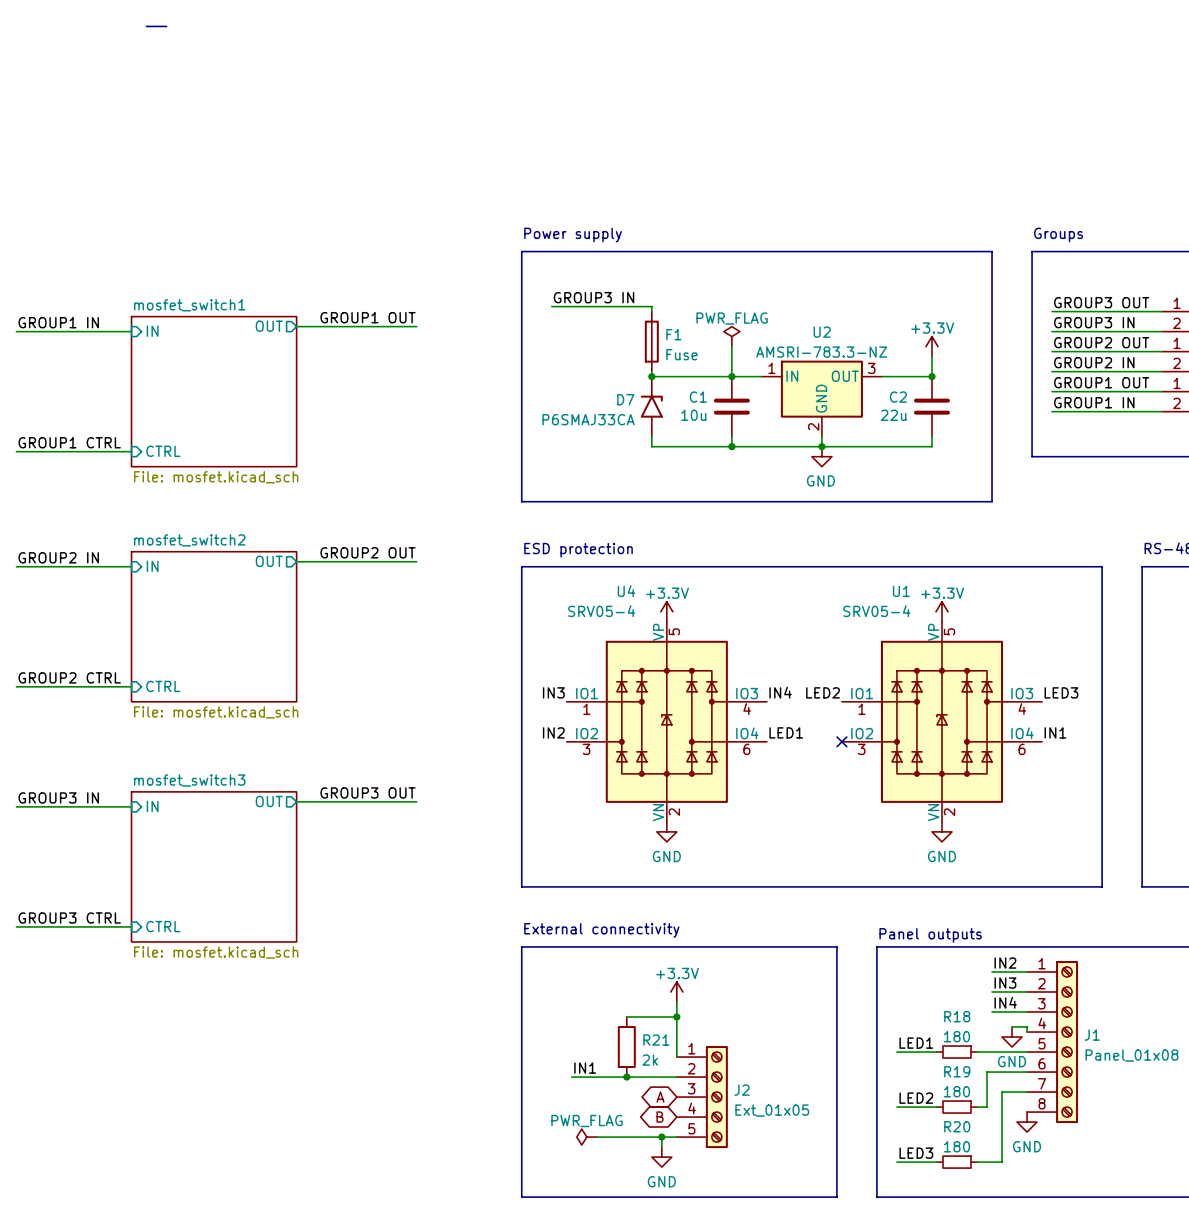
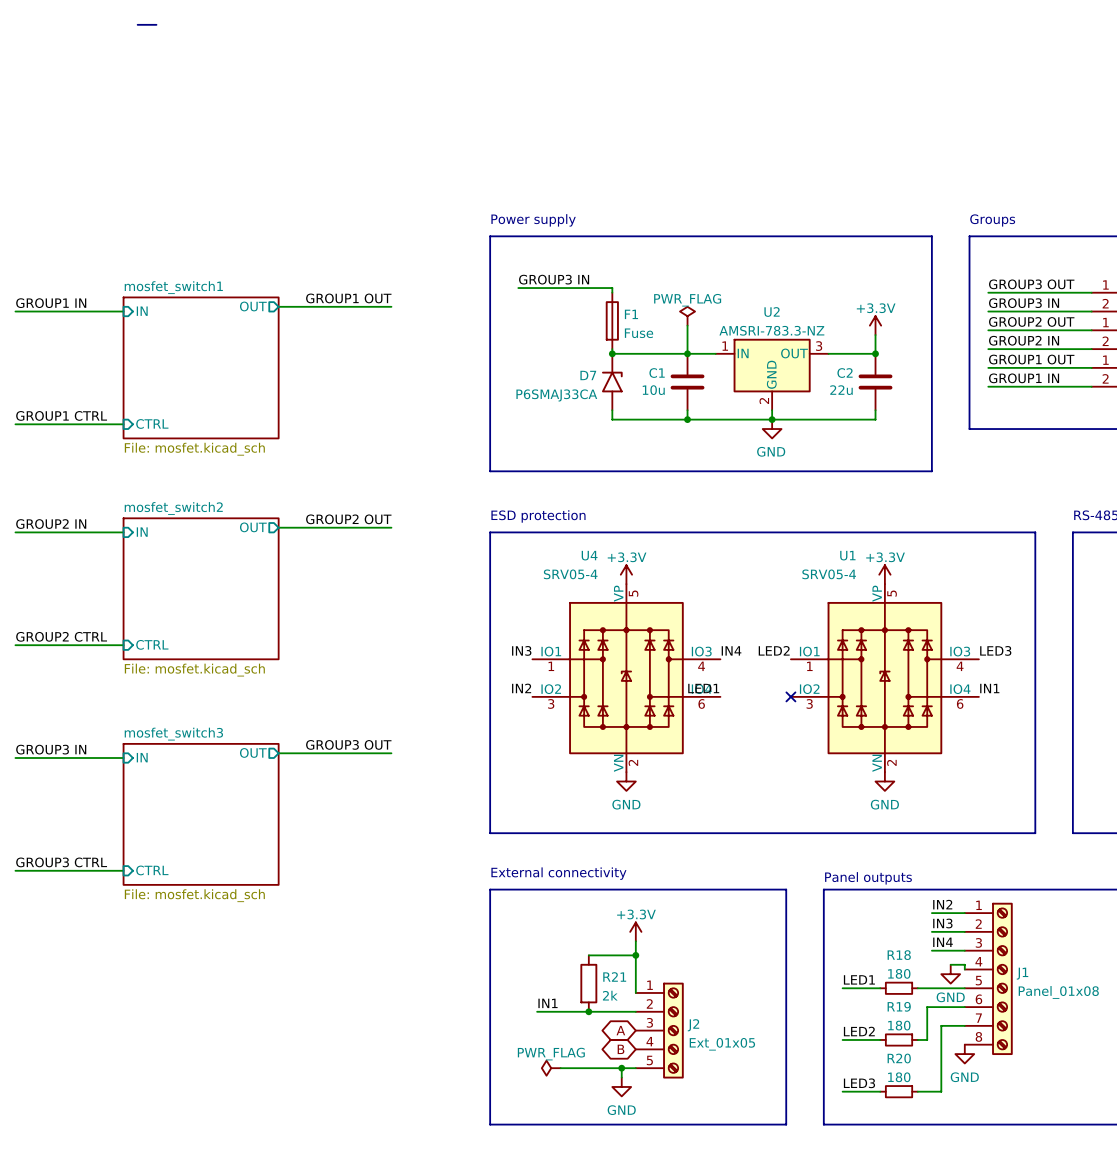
label position: LED1 (786, 732) -> LED1 (703, 688)

